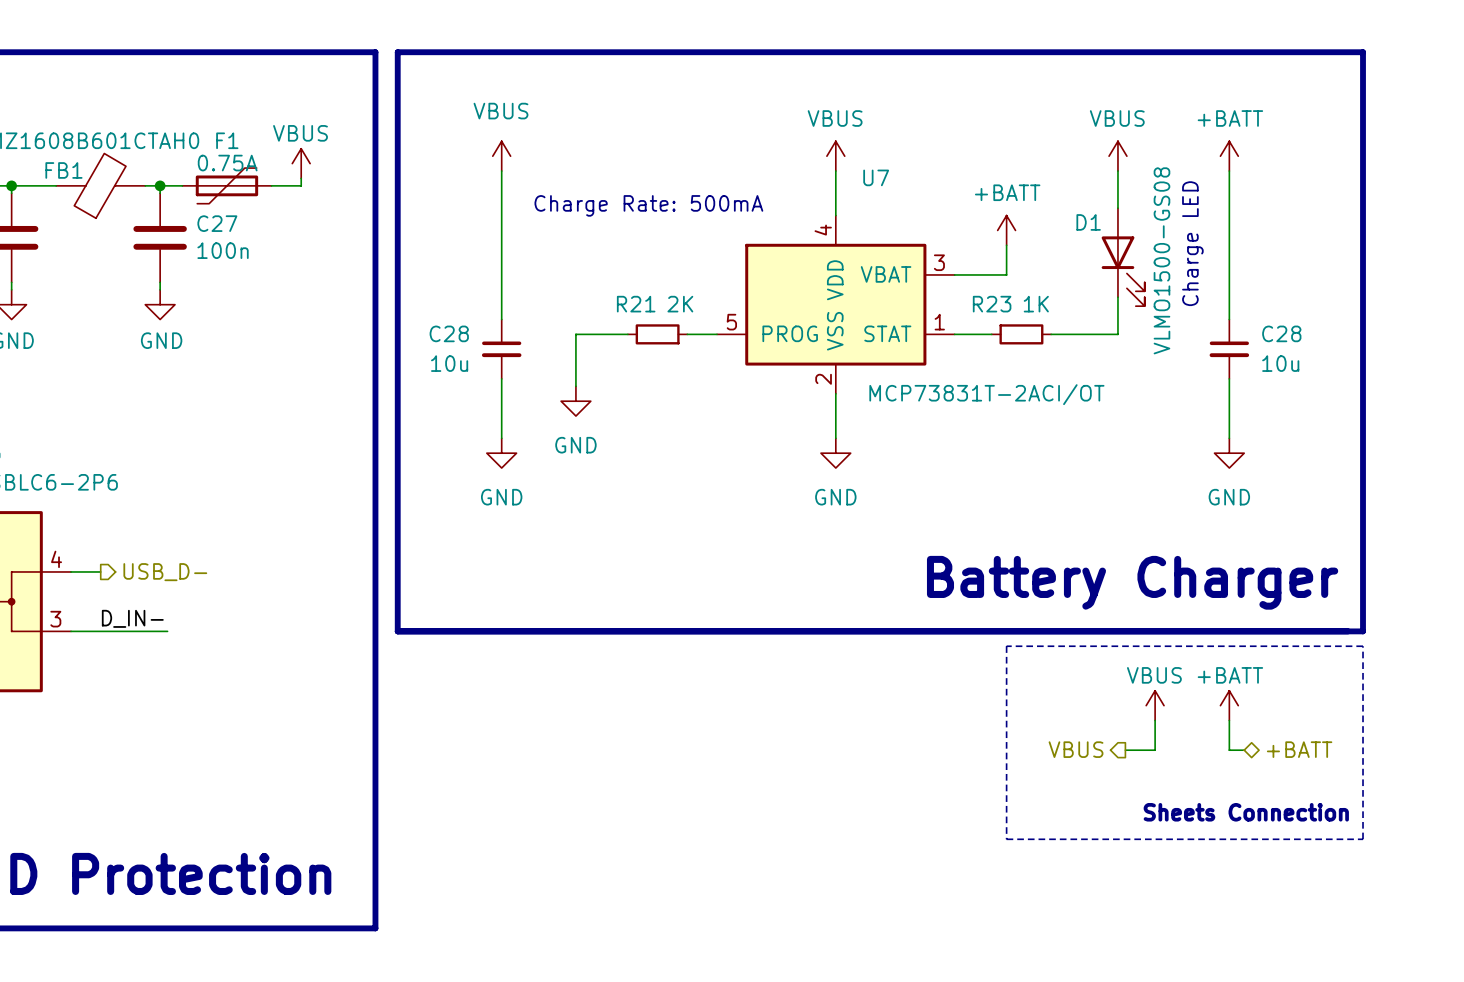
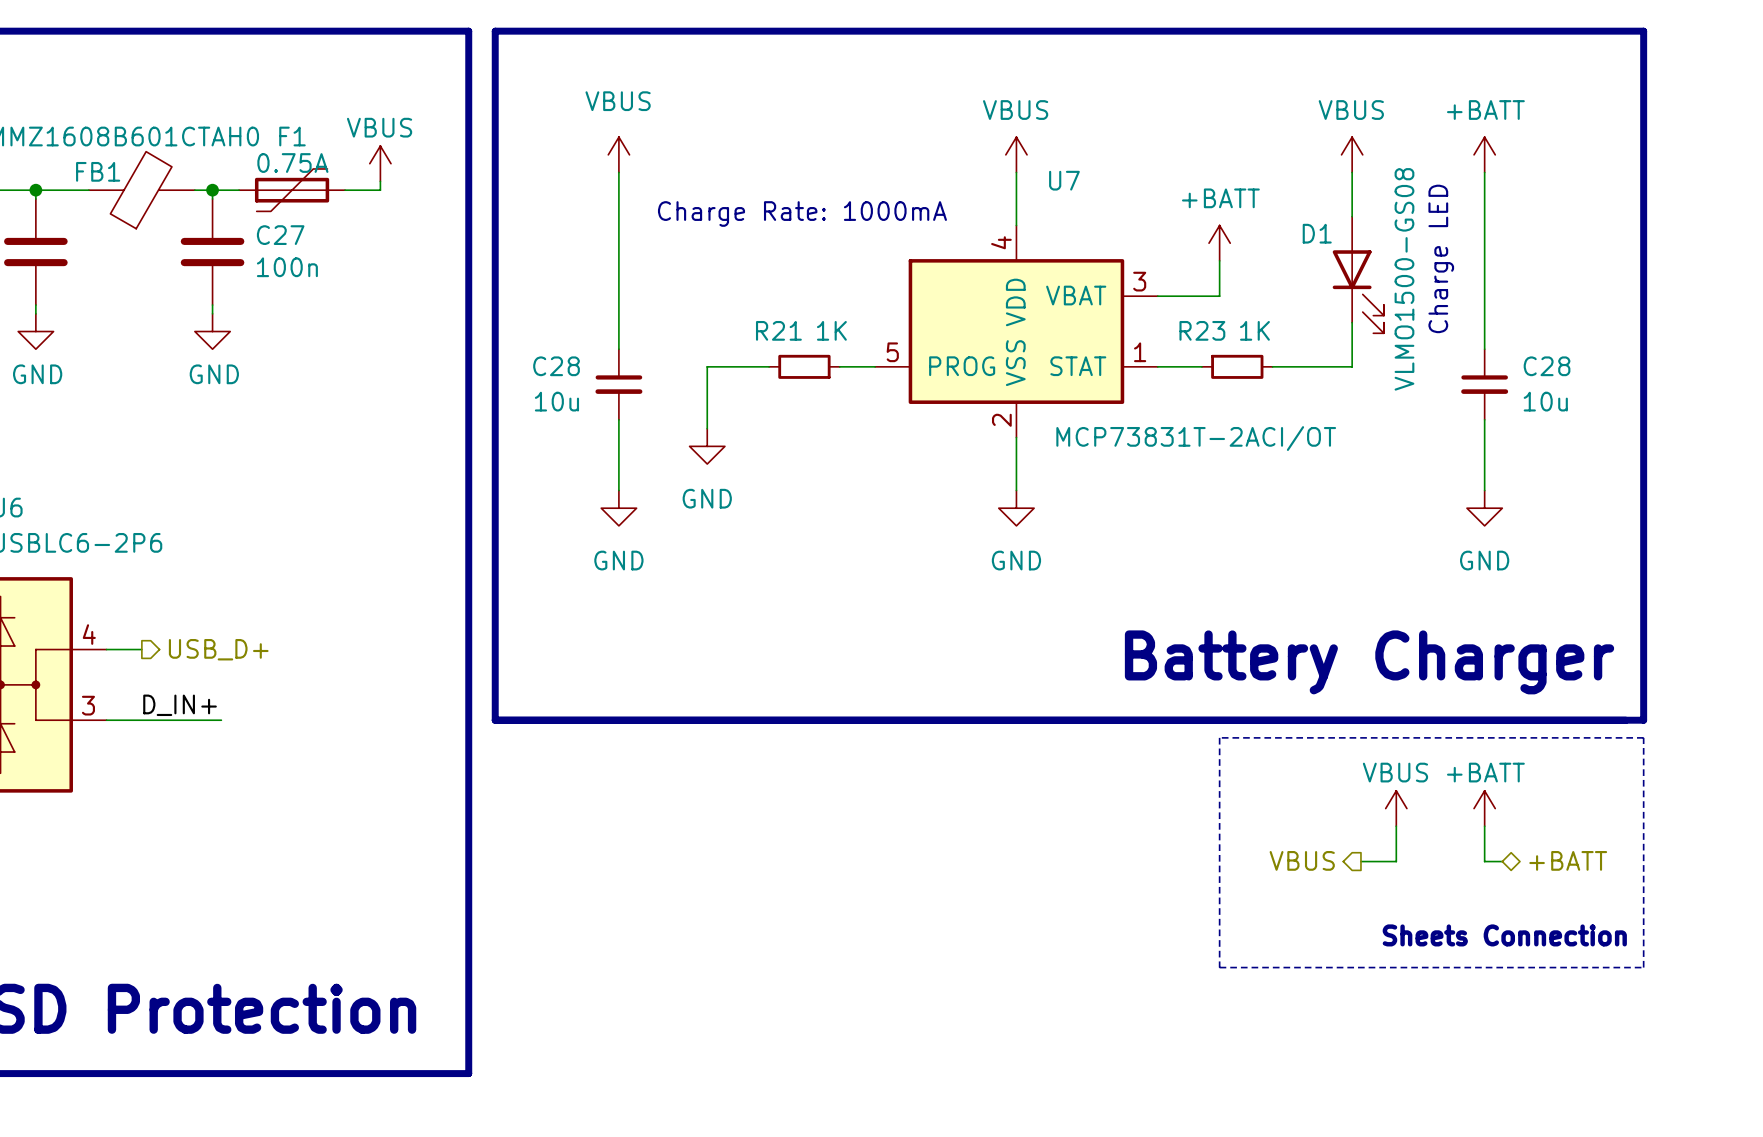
text: Charge Rate: 500mA (648, 205) -> Charge Rate: 1000mA (802, 213)
R21 value: 2K (680, 304) -> 1K (831, 330)
hierarchical label: USB_D- (165, 572) -> USB_D+ (218, 649)
label: D_IN- (132, 618) -> D_IN+ (180, 705)

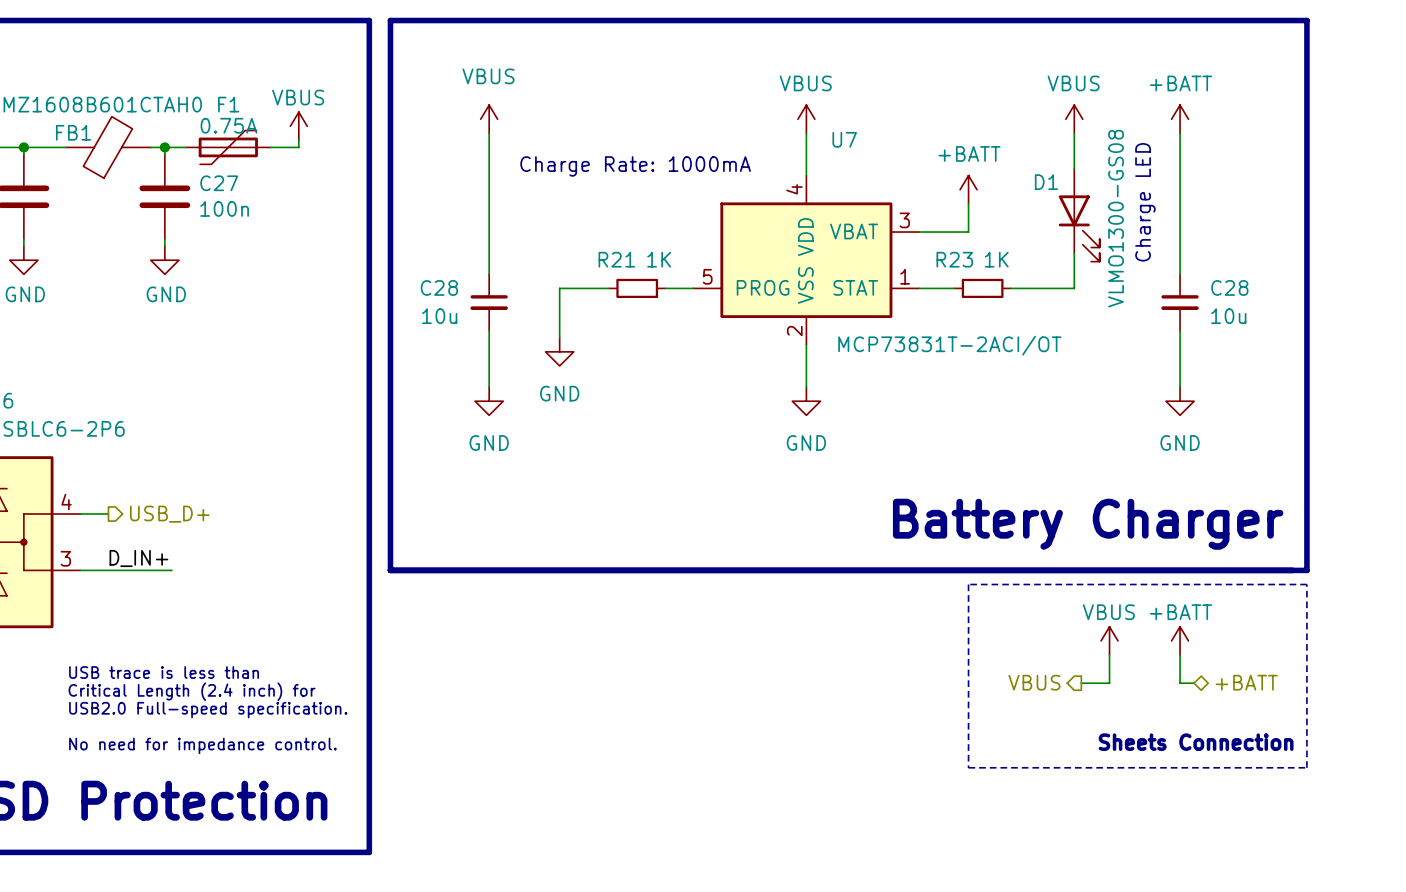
D1 value: VLMO1500-GS08 (1404, 279) -> VLMO1300-GS08 (1116, 218)
text: none -> USB trace is less than (164, 672)
text: none -> Critical Length (2.4 inch) for (192, 691)
text: none -> USB2.0 Full-speed specification. (208, 710)
text: none -> No need for impedance control. (202, 745)

